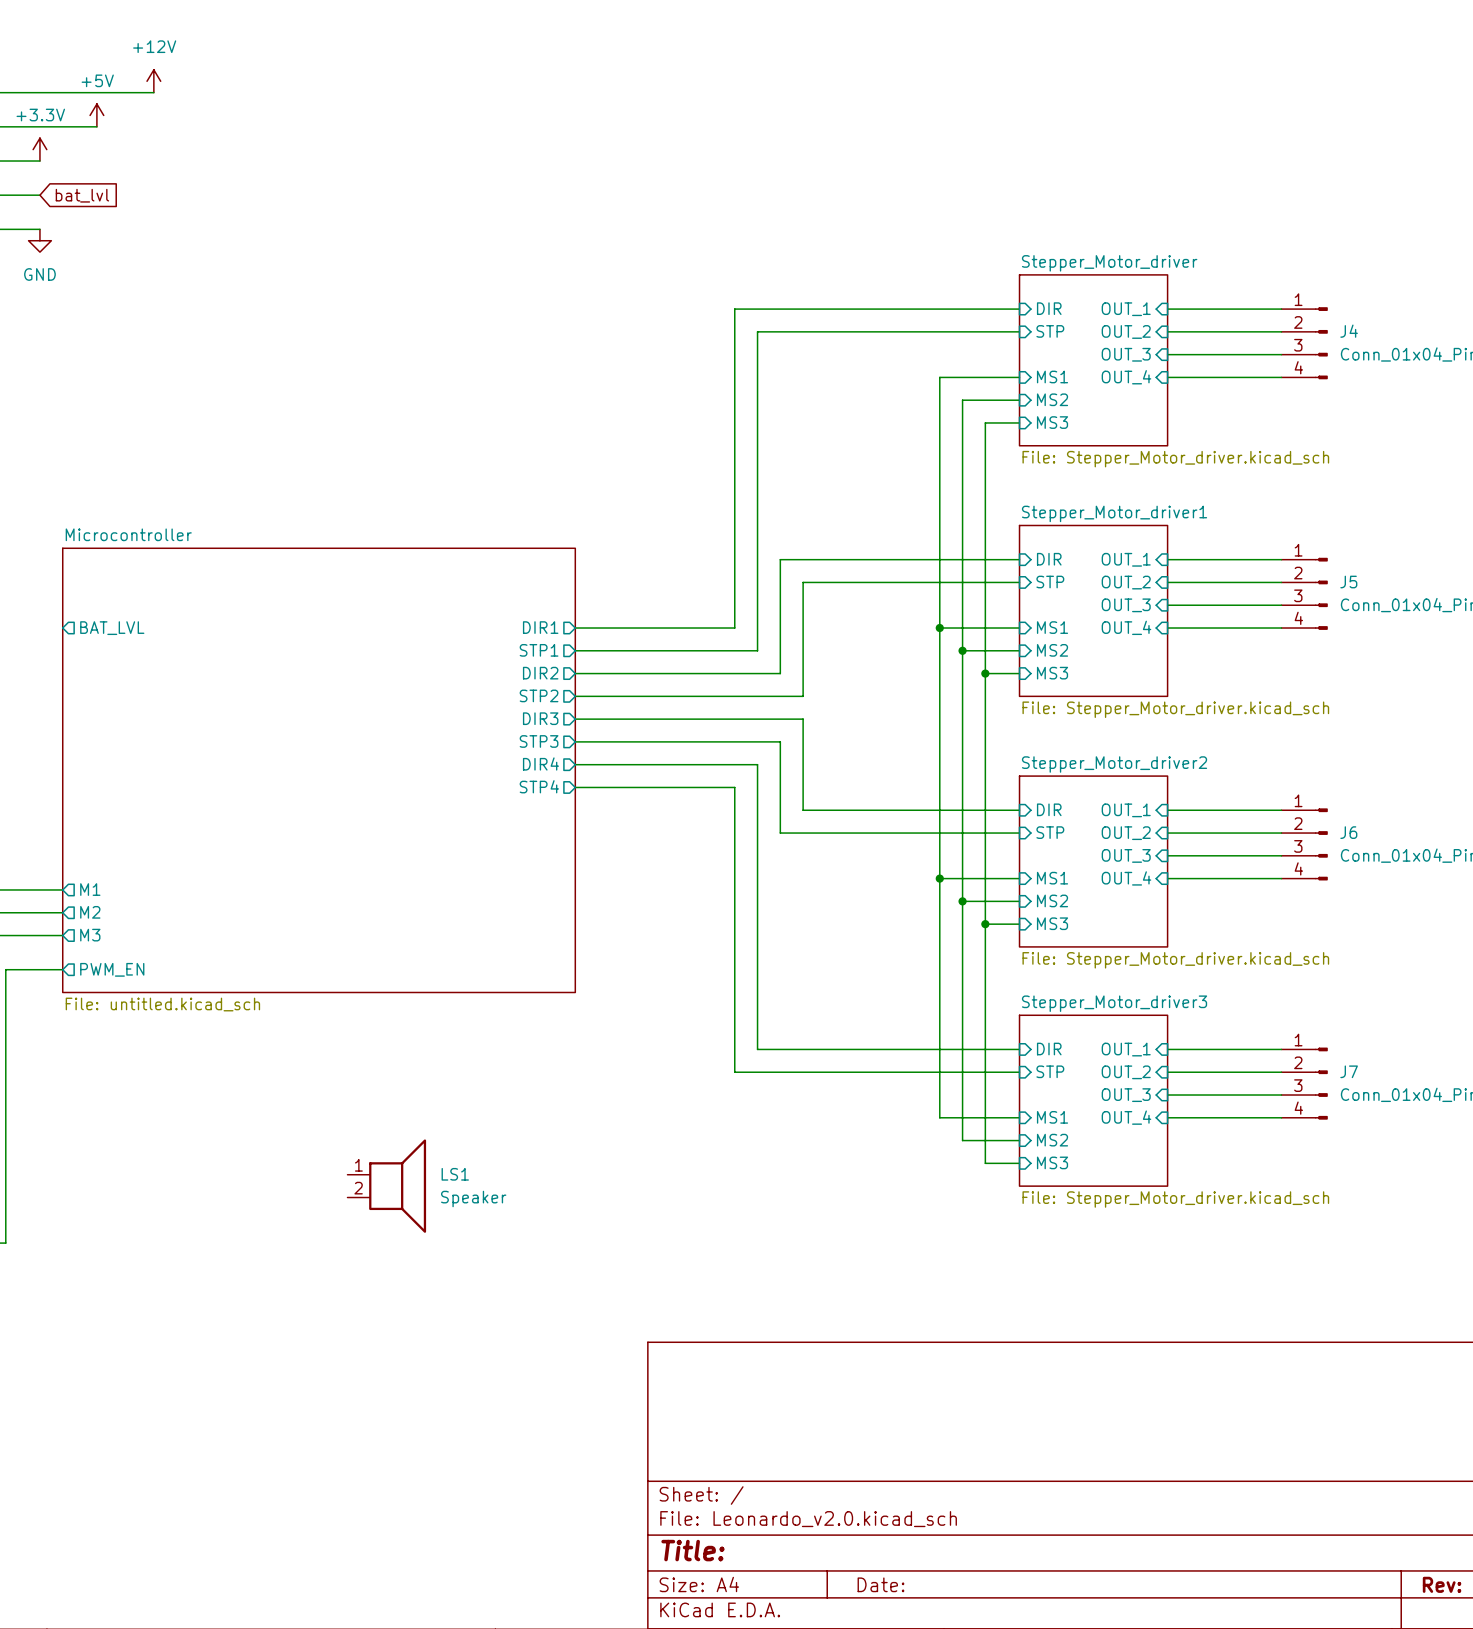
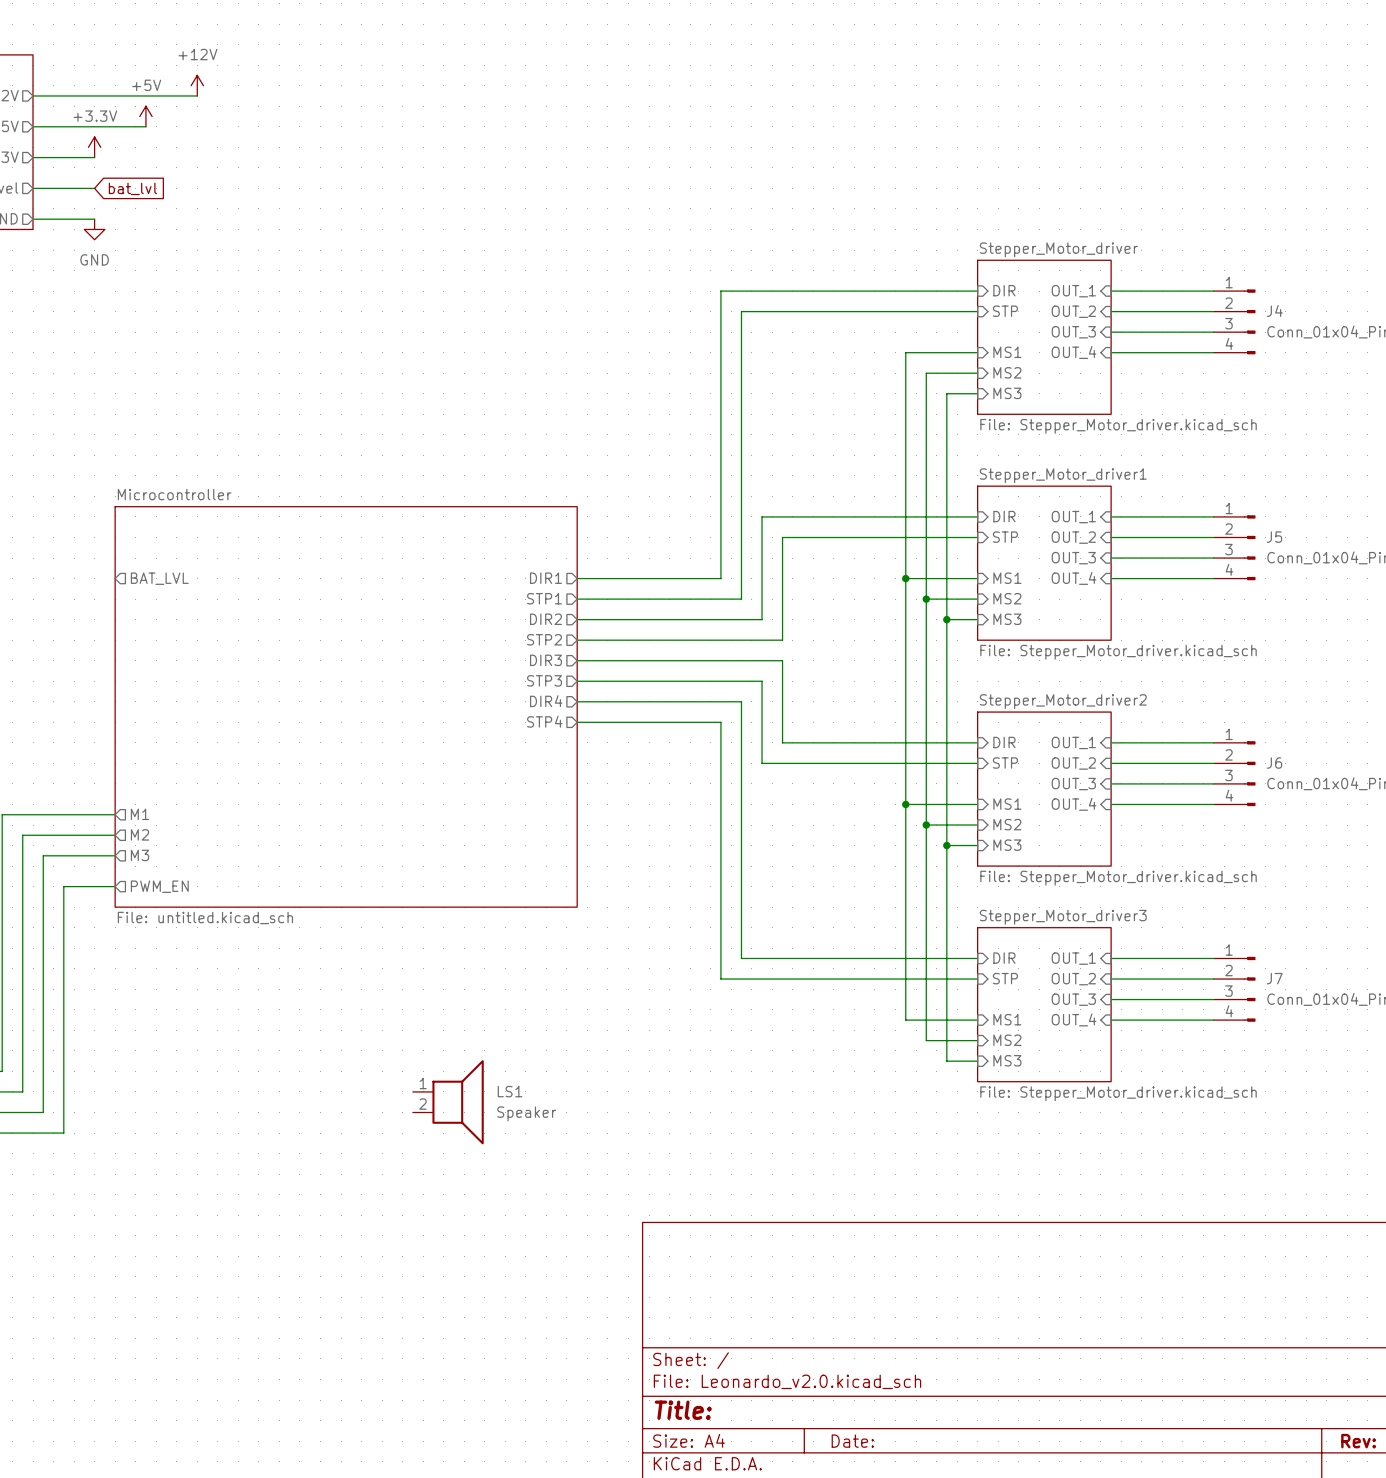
LS1 position: (386, 1186) -> (448, 1102)

